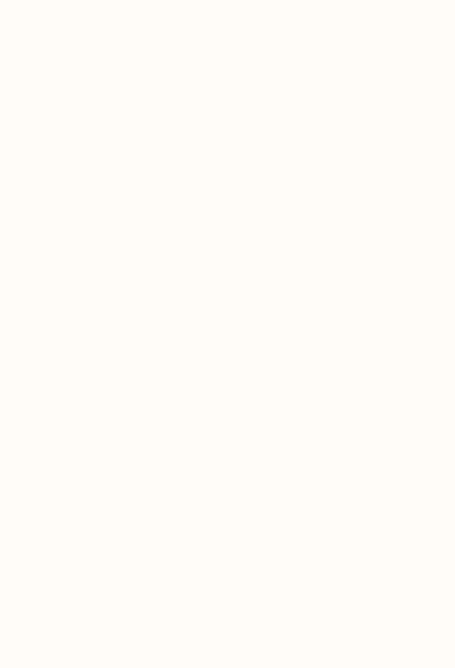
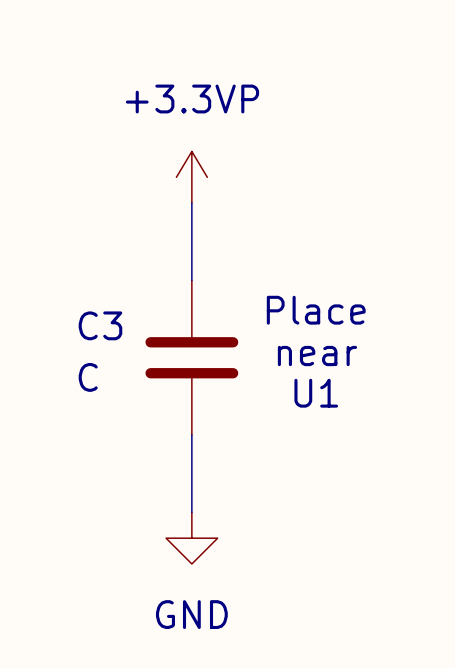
power symbol: none -> +3.3VP (191, 177)
wire: none -> (191, 203) (191, 280)
text: none -> Place (316, 310)
text: none -> near (317, 356)
C3: none -> C (191, 357)
text: none -> U1 (316, 393)
wire: none -> (191, 435) (191, 512)
power symbol: none -> GND (191, 538)

